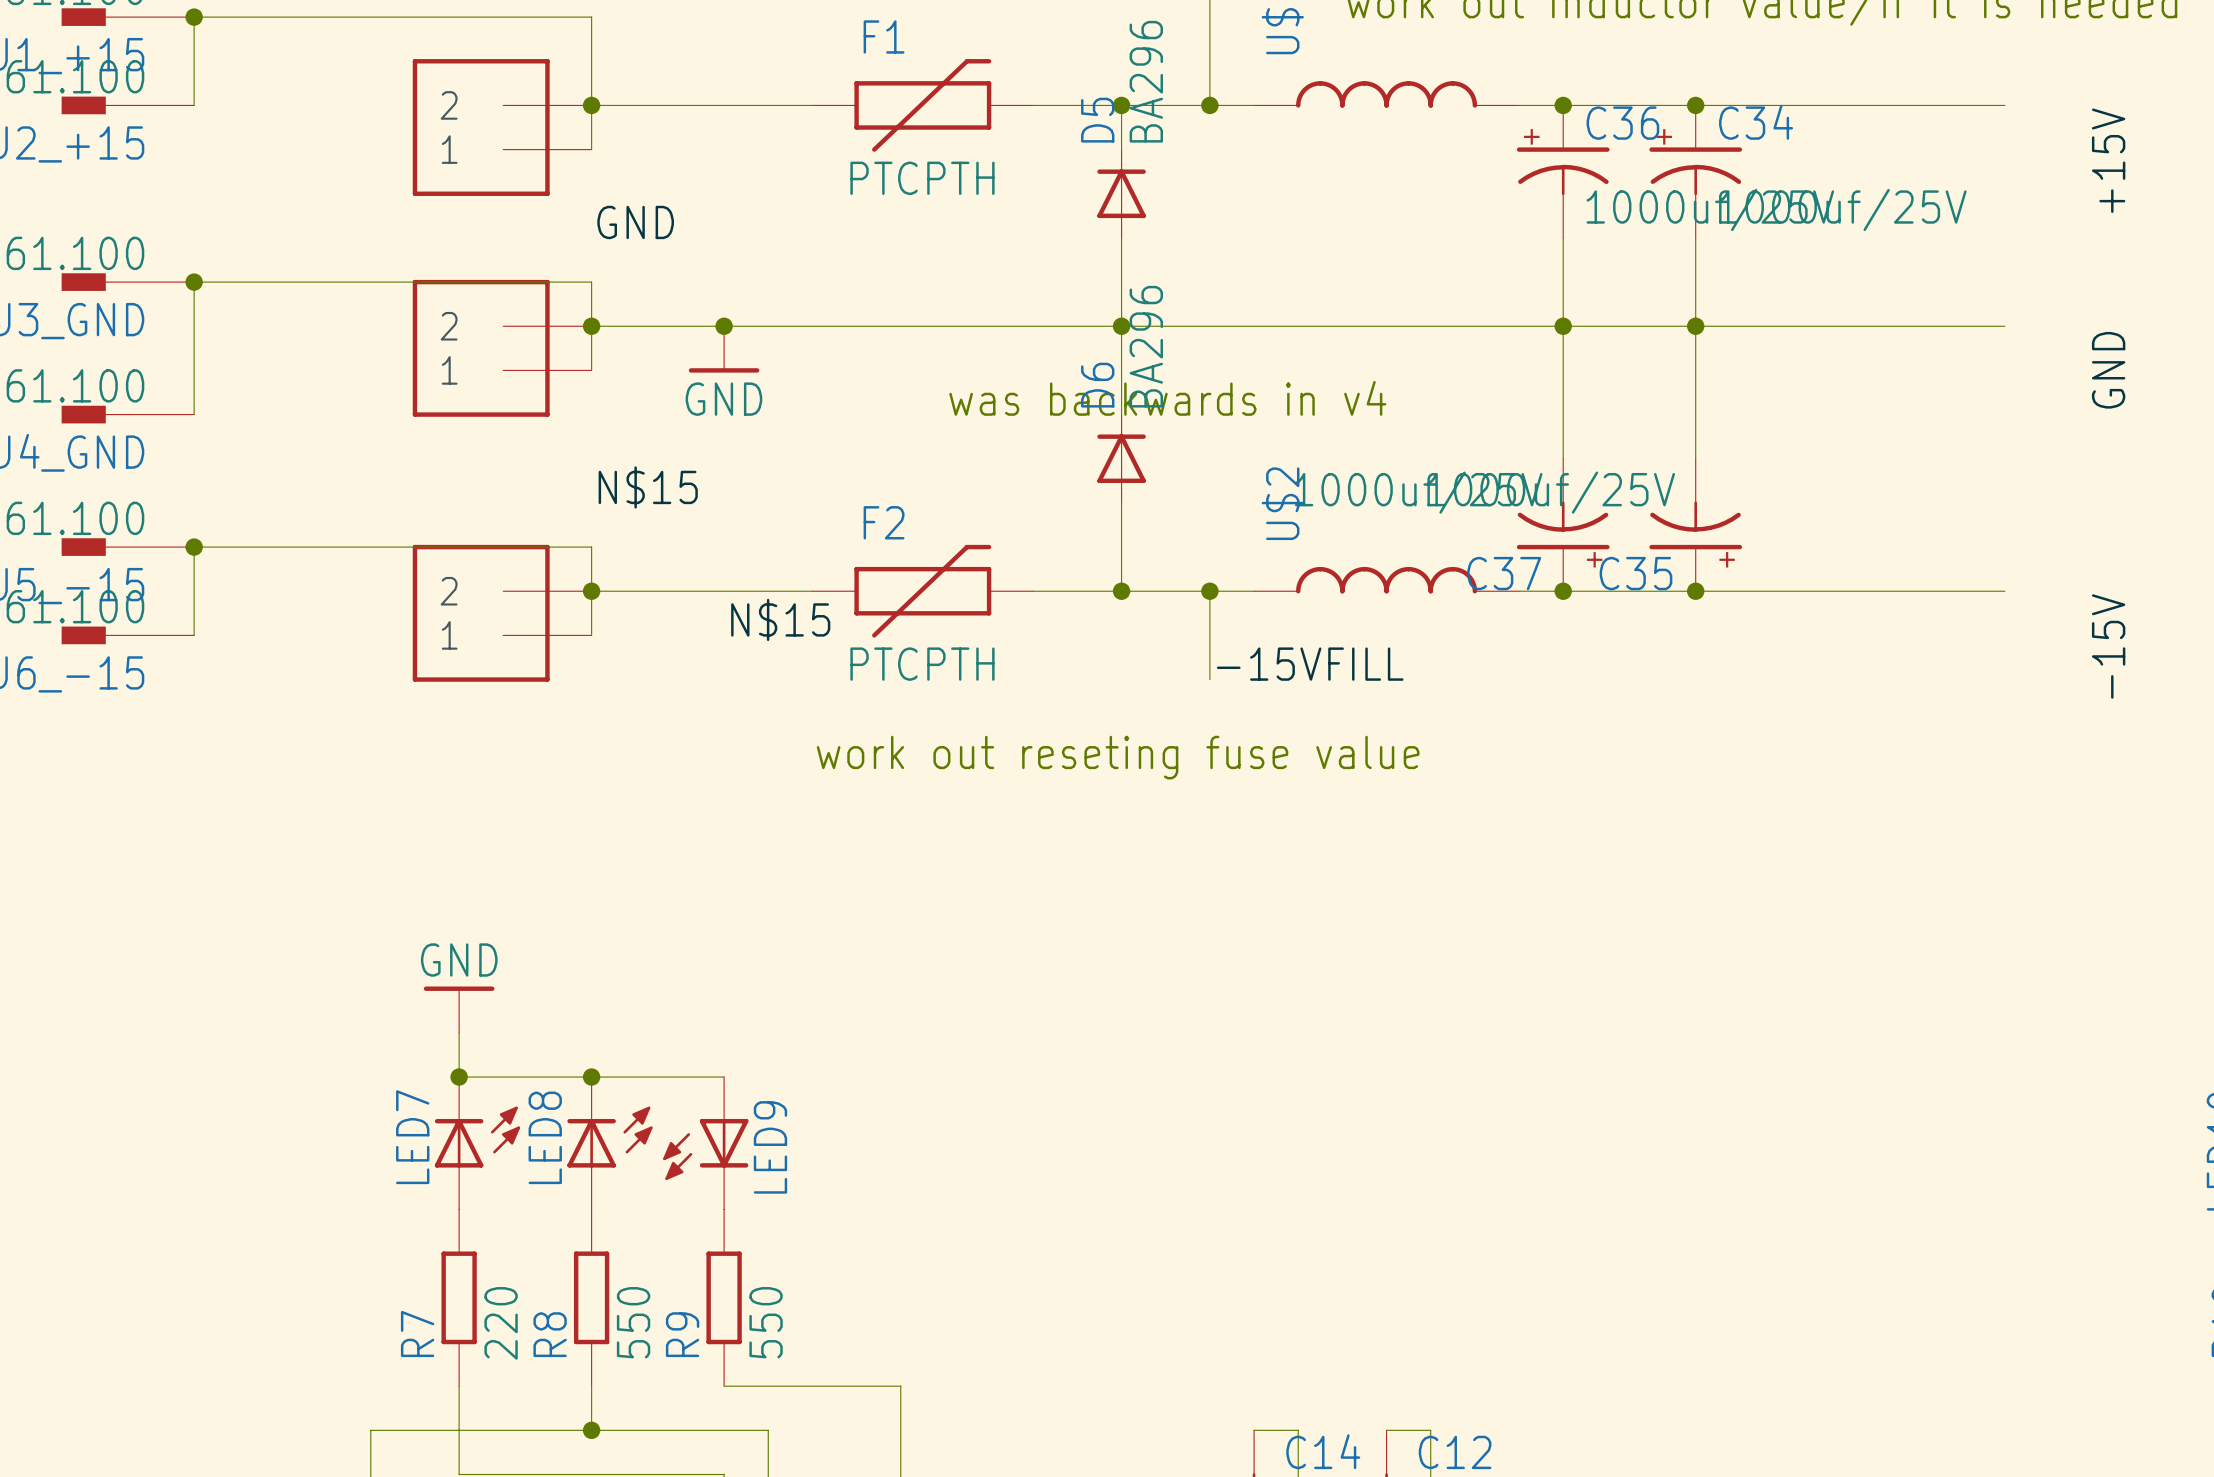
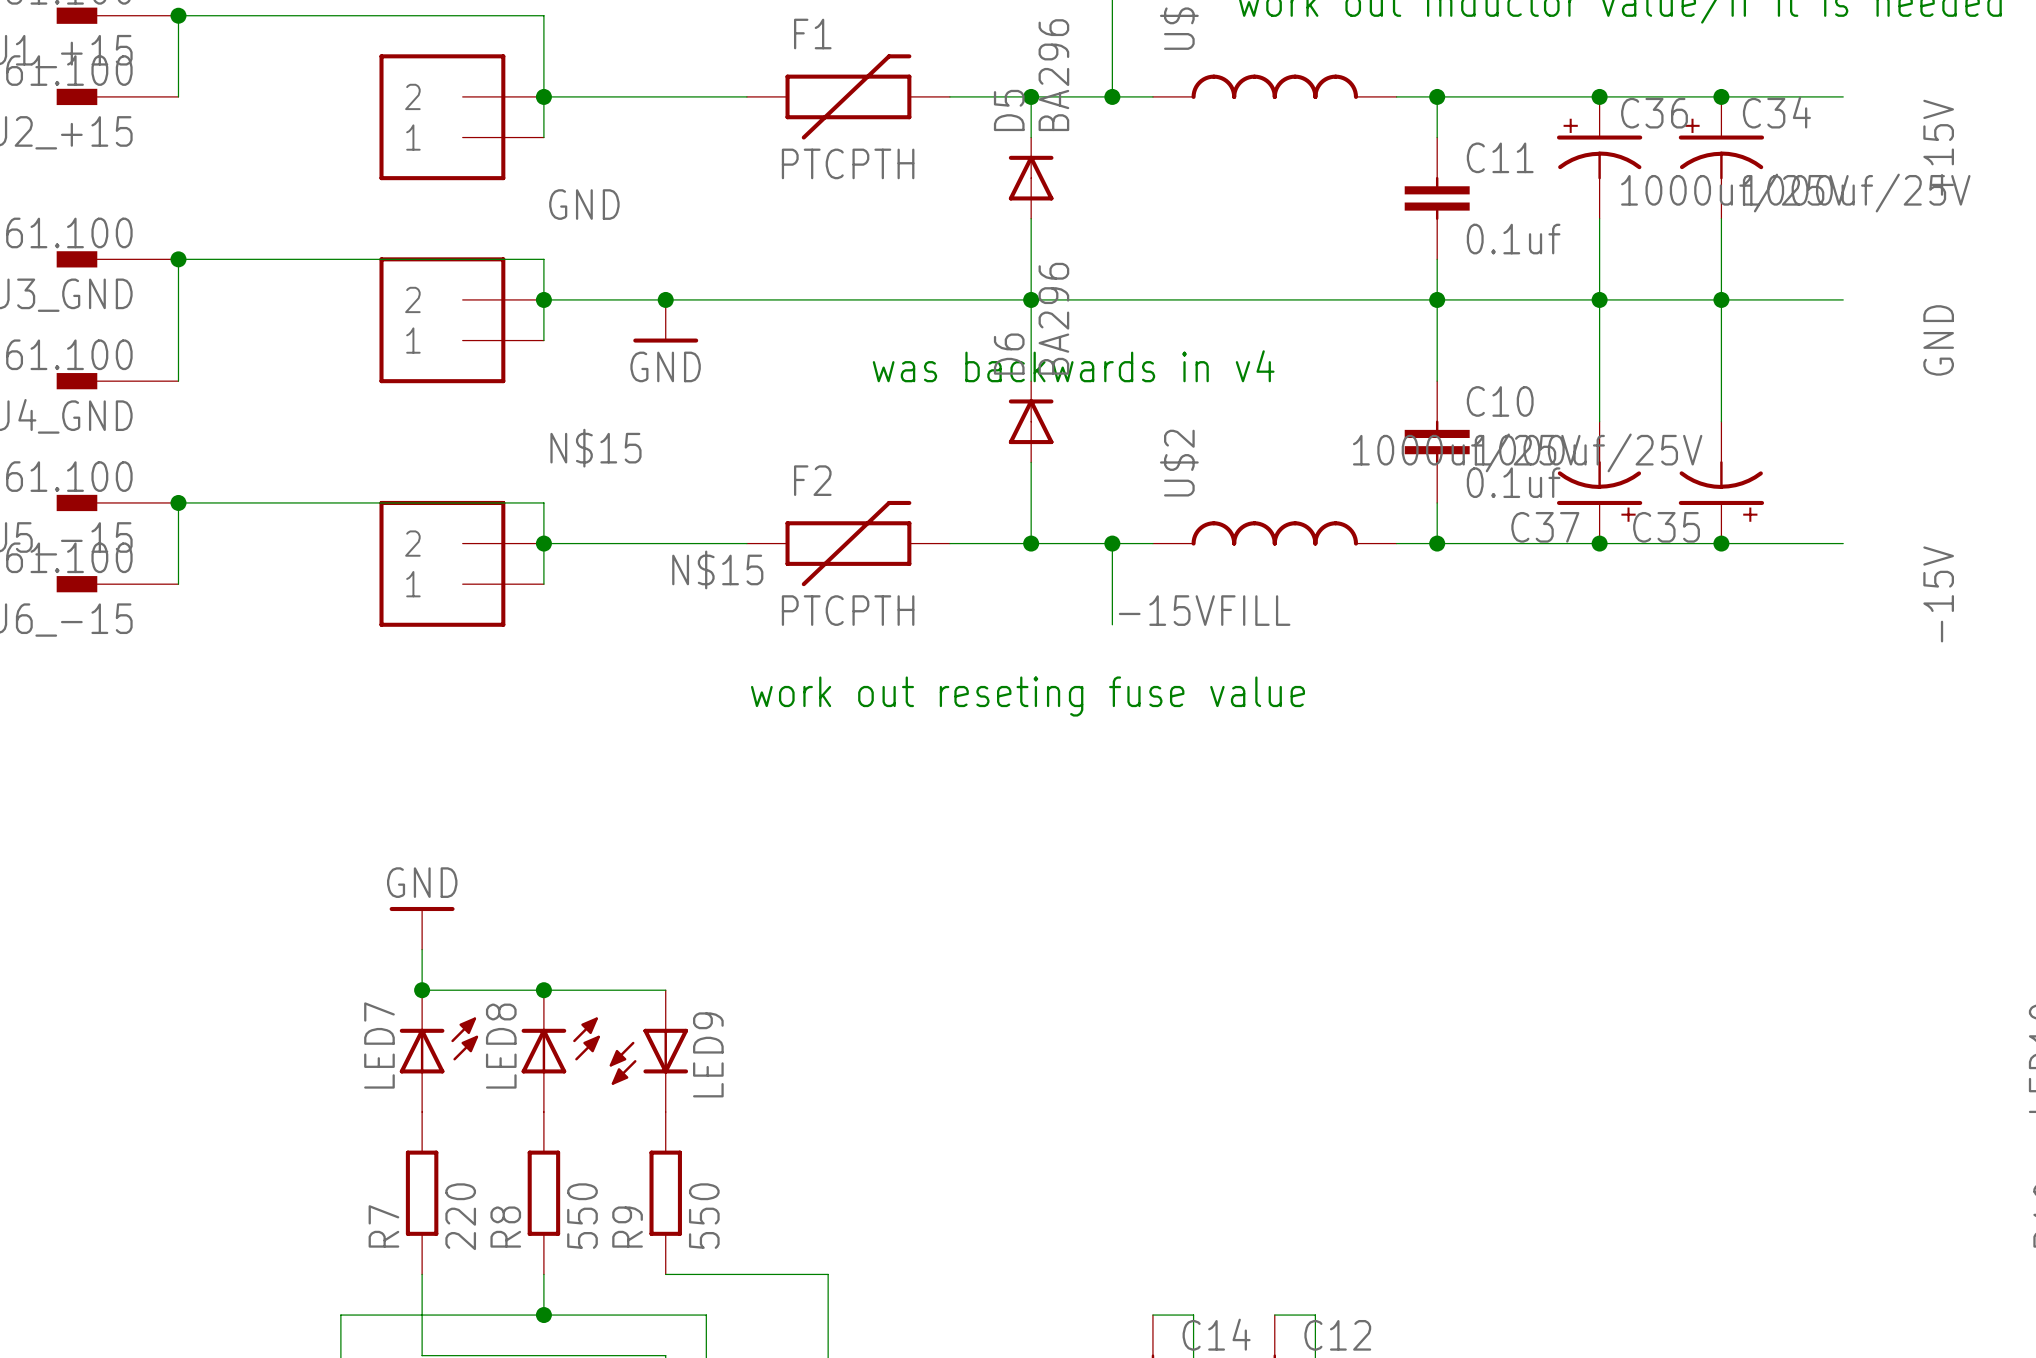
junction position: (1695, 105) -> (1599, 96)
junction: none -> (1721, 96)
C36 position: (1563, 171) -> (1599, 157)
C34 position: (1695, 171) -> (1721, 157)
C11: none -> 0.1uf (1437, 198)
wire: (1695, 237) (1695, 458) -> (1599, 218) (1599, 421)
wire: none -> (1721, 218) (1721, 421)
junction position: (1695, 326) -> (1599, 299)
junction: none -> (1721, 299)
C10: none -> 0.1uf (1437, 442)
C37 position: (1563, 524) -> (1599, 482)
C35 position: (1695, 524) -> (1721, 482)
junction position: (1695, 591) -> (1599, 543)
junction: none -> (1721, 543)

